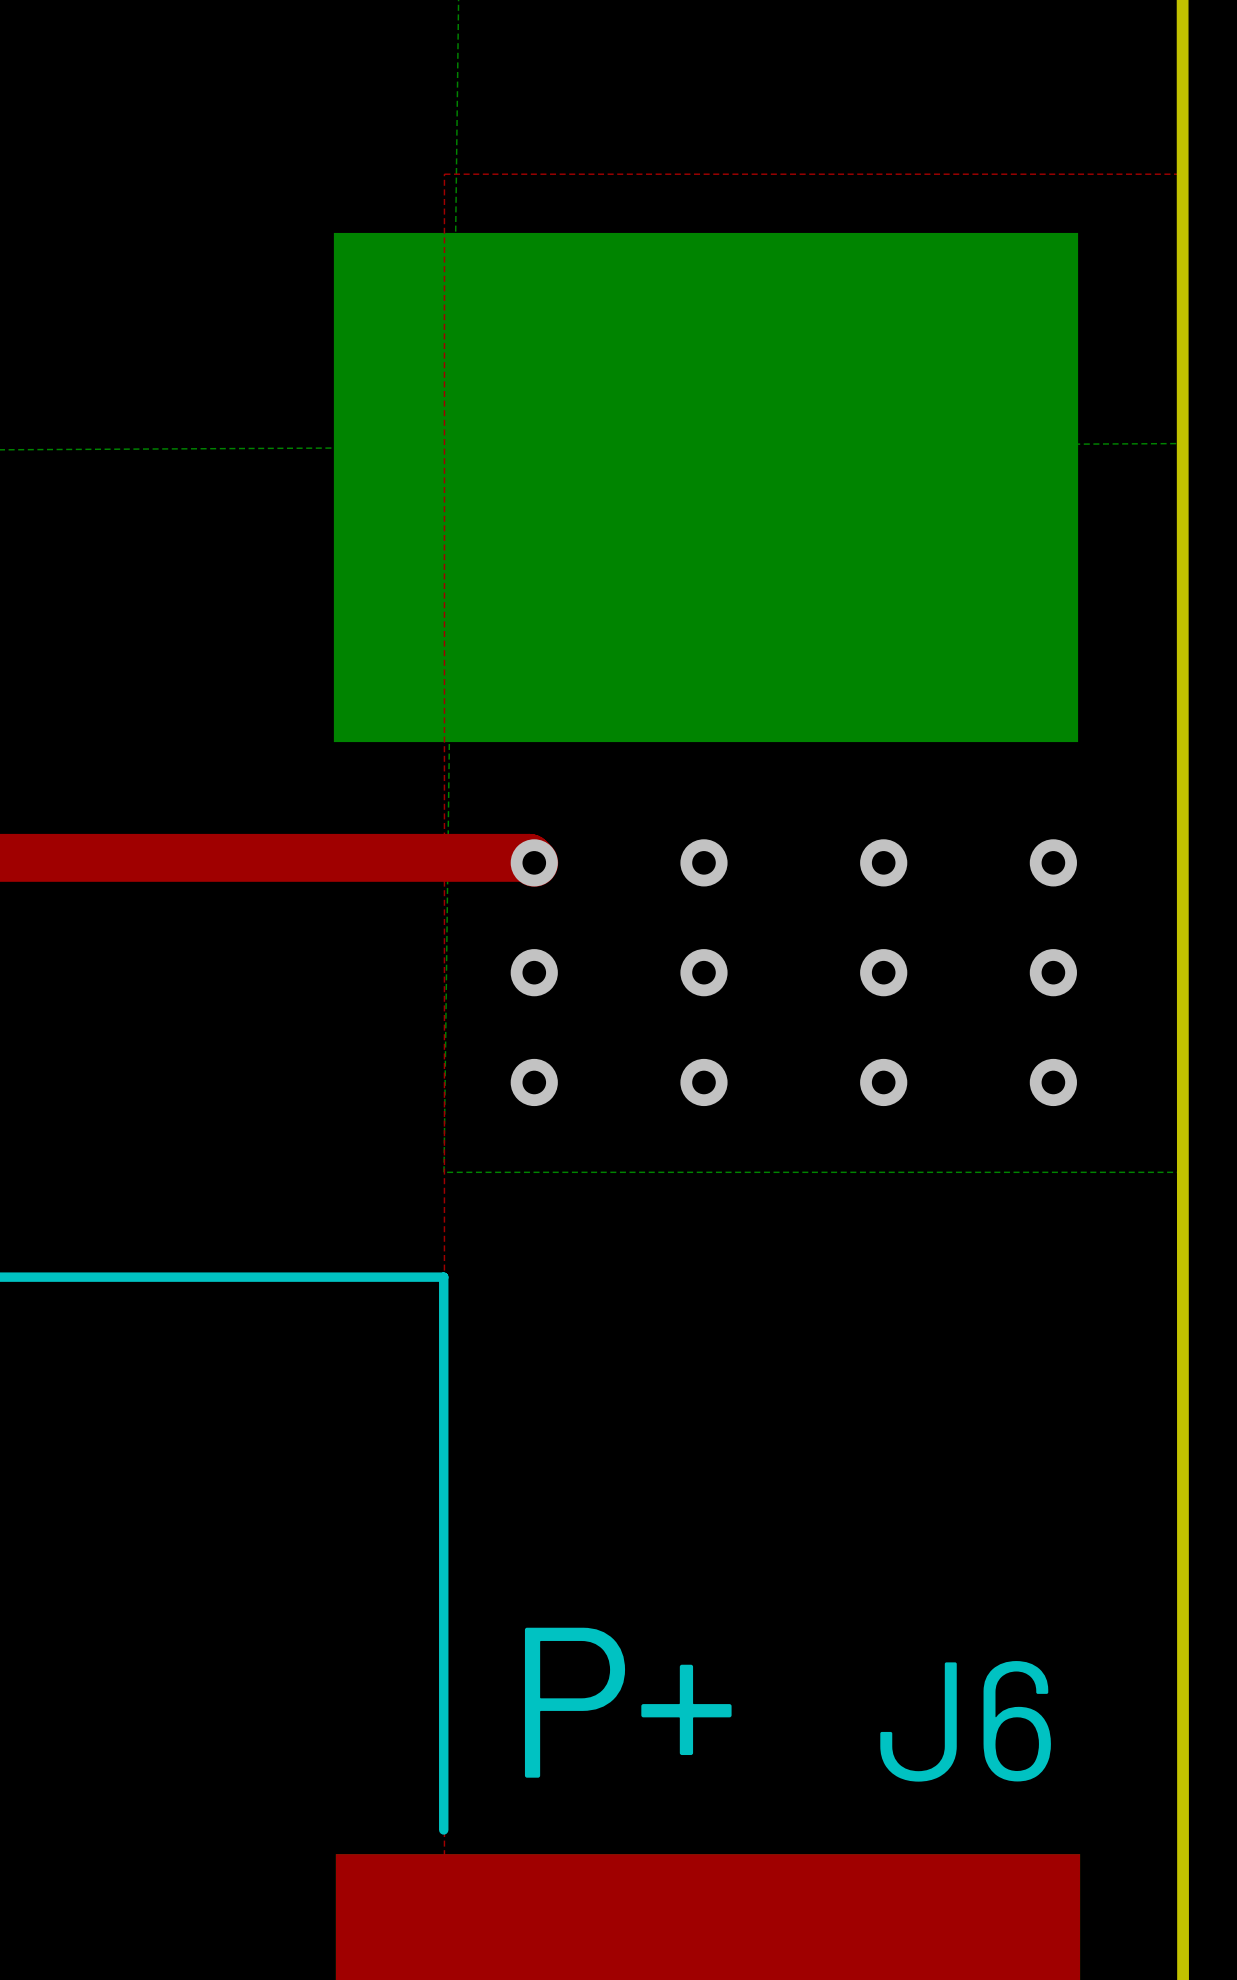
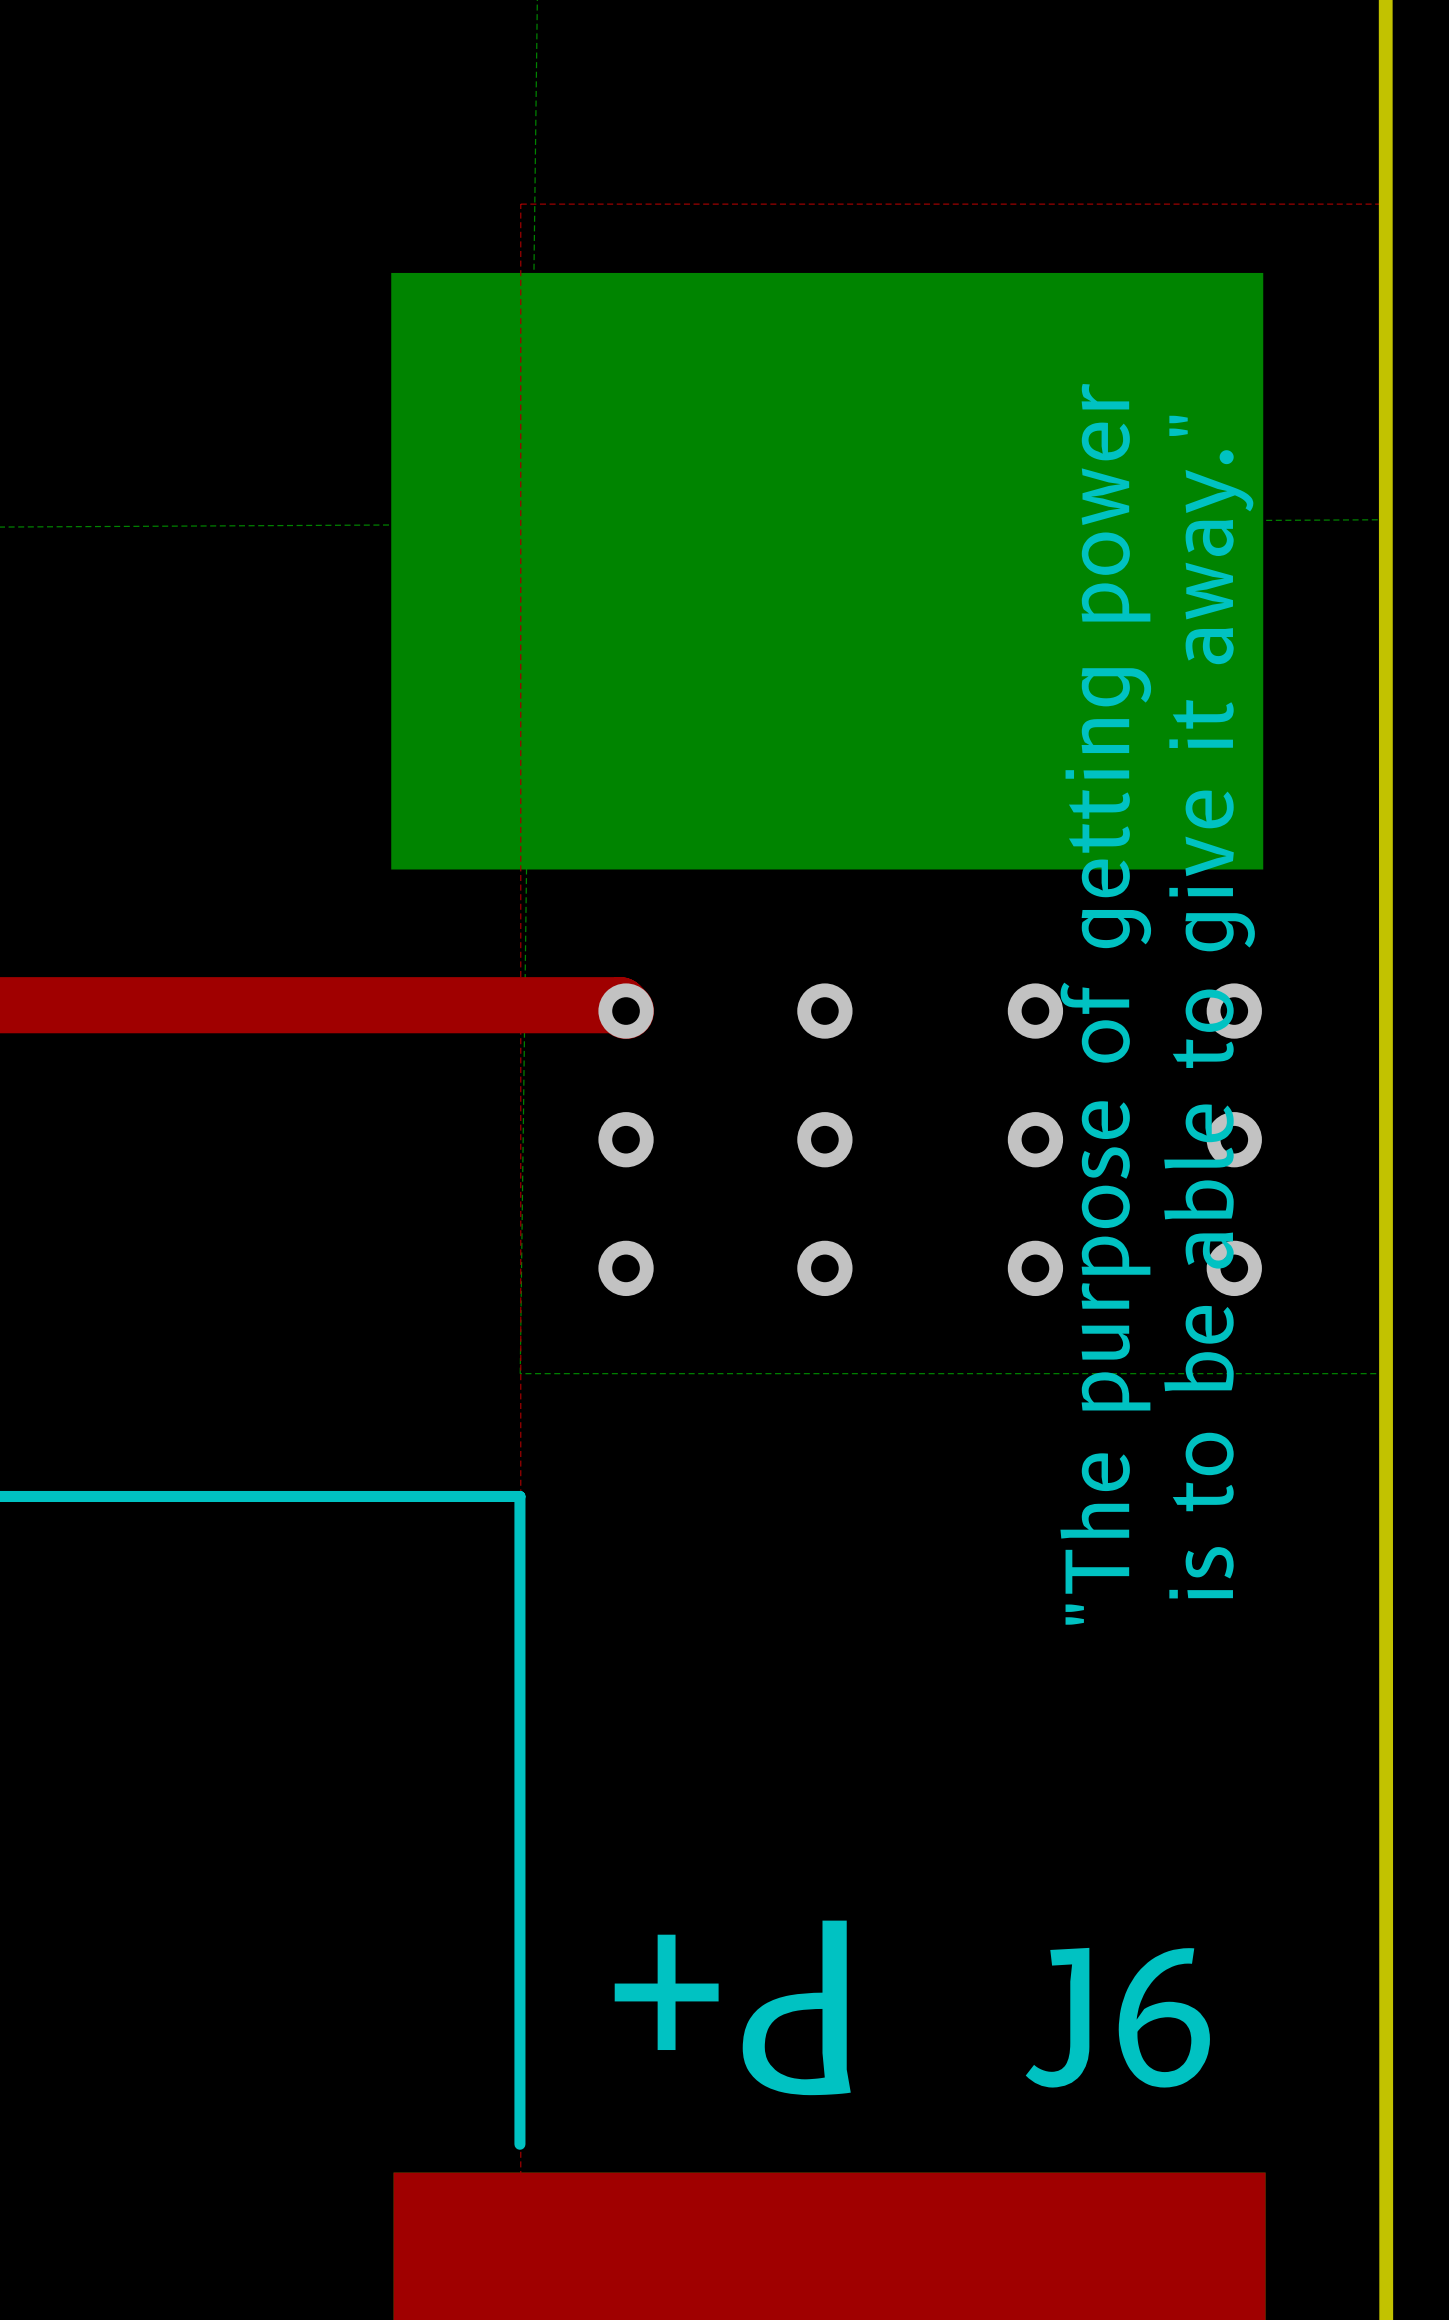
text: none -> is to be able to give it away." (1209, 1007)
text: none -> "The purpose of getting power (1105, 1004)
text rotation: 0° (628, 1702) -> 180° (732, 2007)

